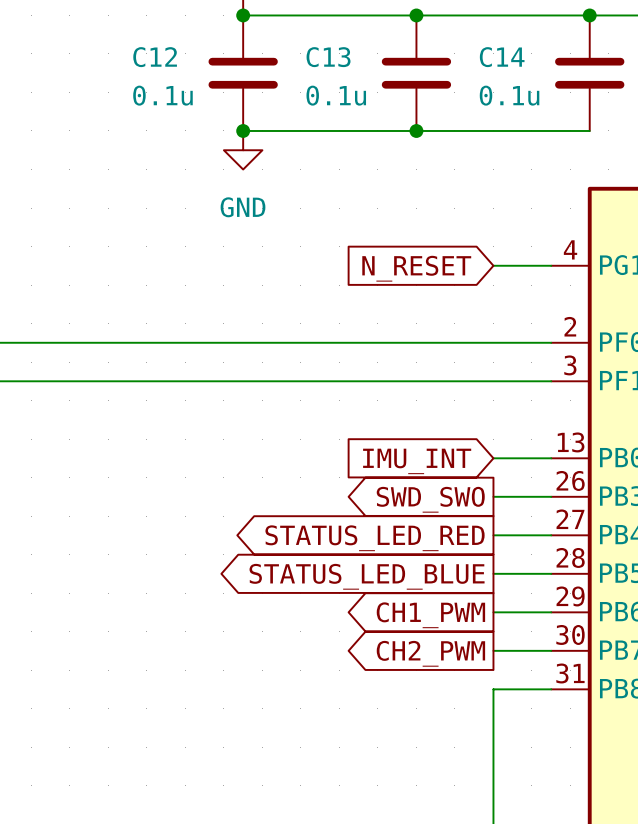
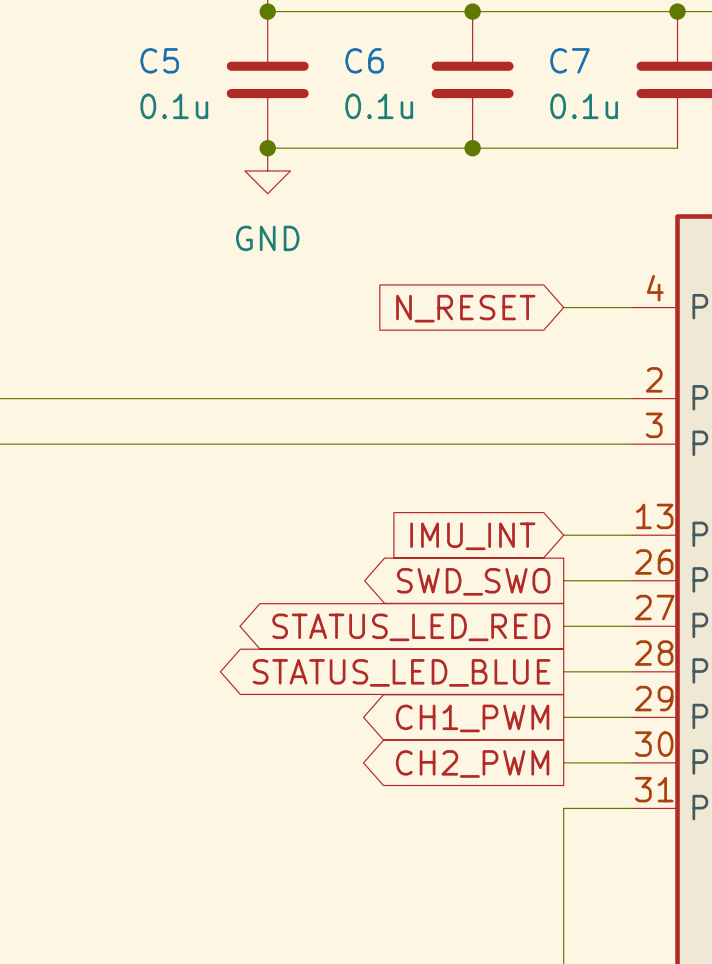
C12 name: C12 (155, 57) -> C5 (159, 60)
C13 name: C13 (328, 57) -> C6 (364, 60)
C14 name: C14 (502, 57) -> C7 (570, 60)

